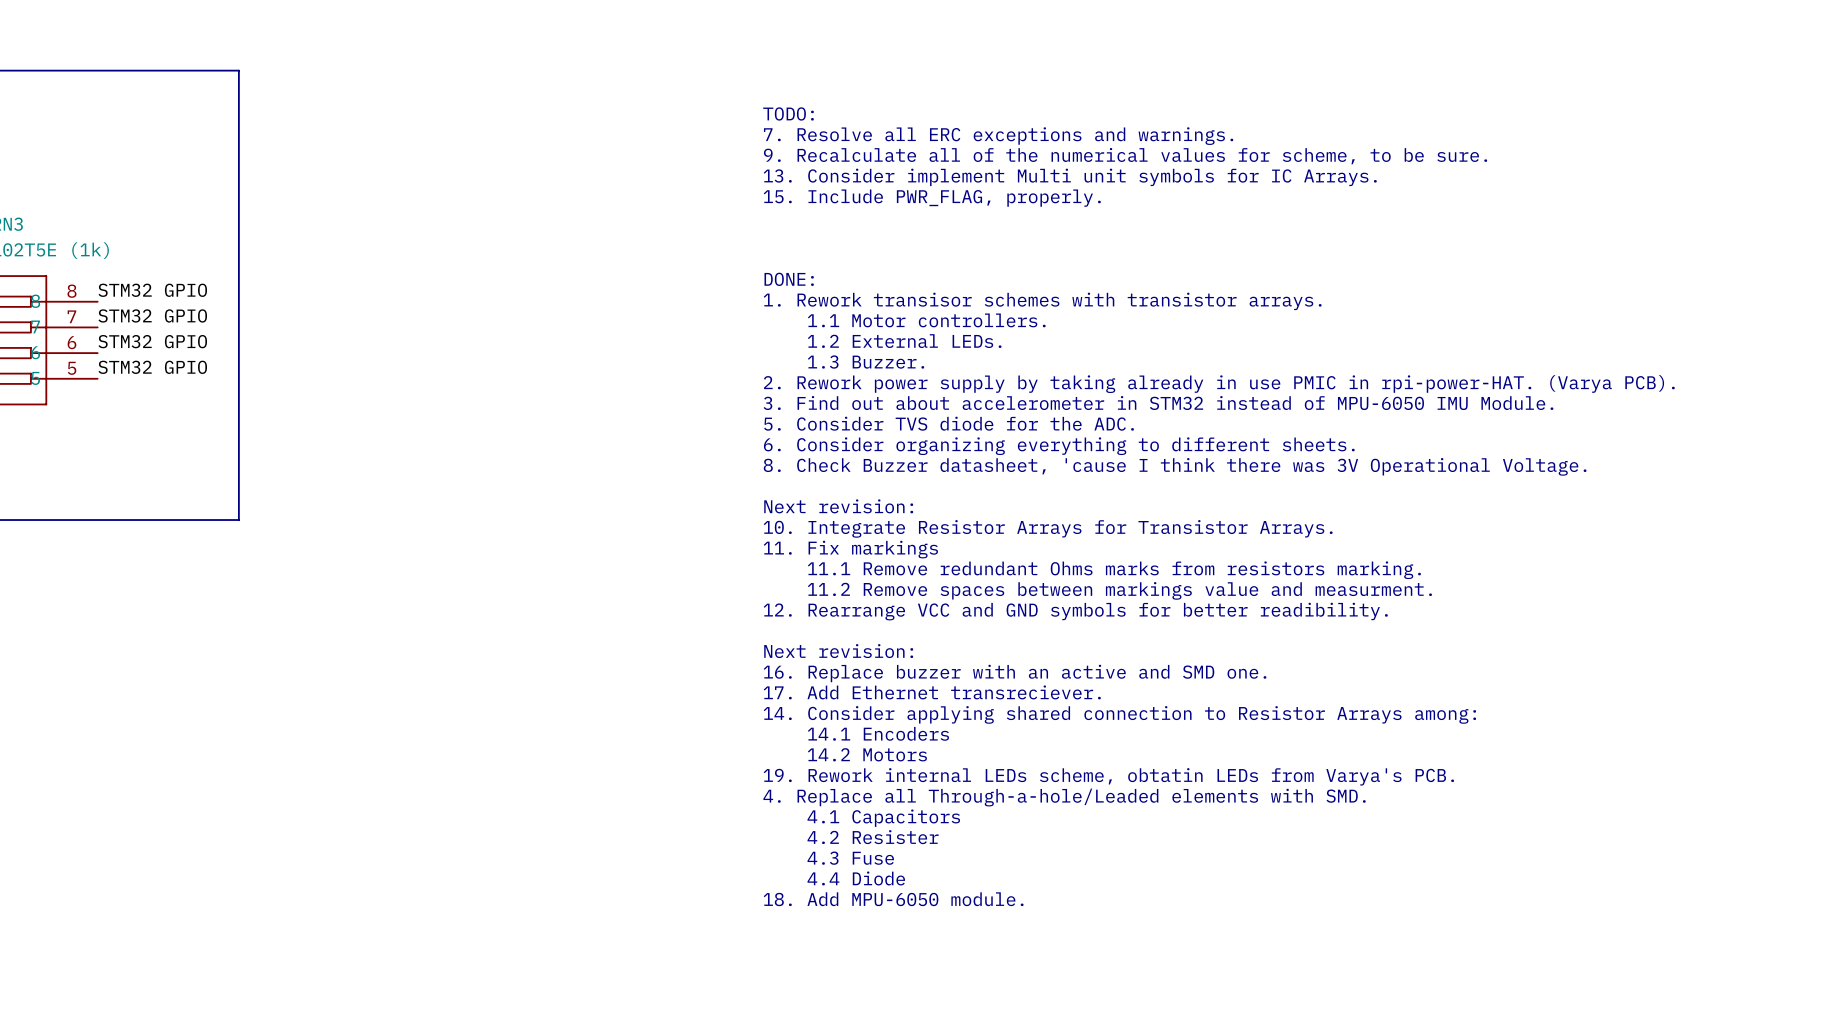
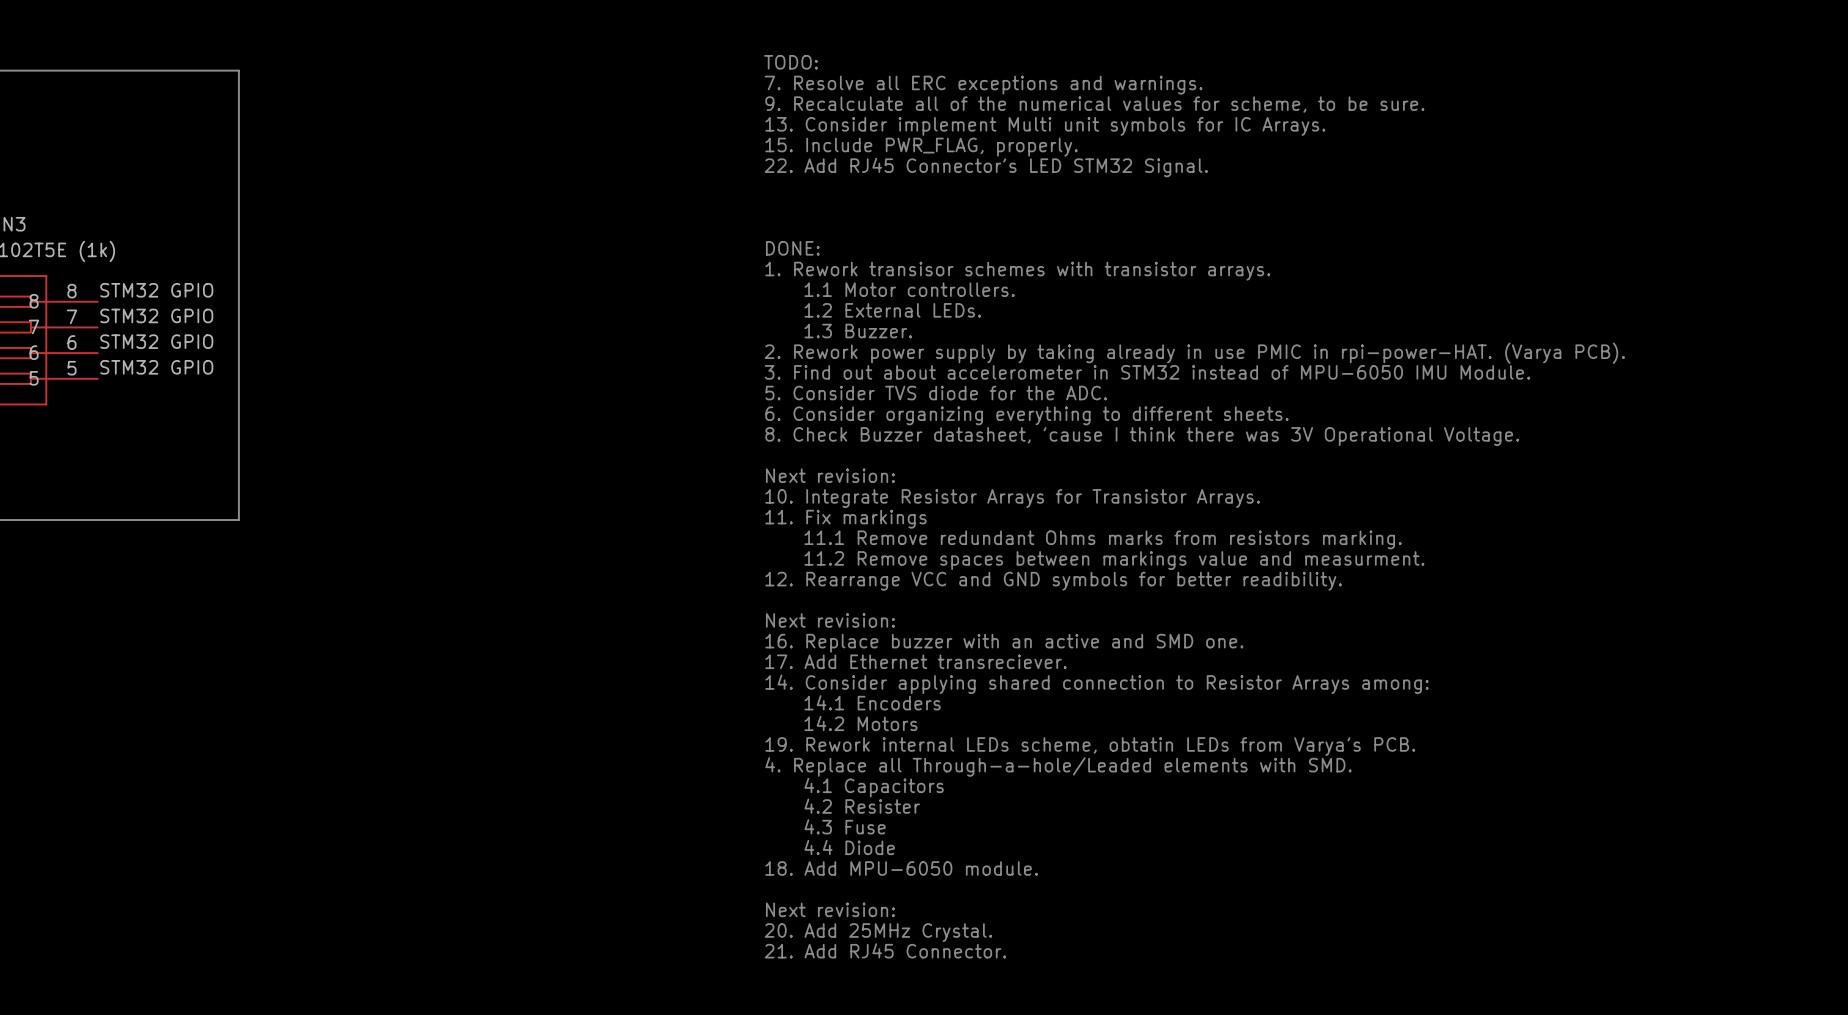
text position: TODO: (788, 113) -> TODO: (790, 62)
text position: 7. Resolve all ERC exceptions and warnings. (998, 136) -> 7. Resolve all ERC exceptions and warnings. (983, 85)
text position: 9. Recalculate all of the numerical values for scheme, to be sure. (1125, 156) -> 9. Recalculate all of the numerical values for scheme, to be sure. (1094, 104)
text: none -> 22. Add RJ45 Connector's LED STM32 Signal. (986, 167)
text position: 13. Consider implement Multi unit symbols for IC Arrays. (1070, 177) -> 13. Consider implement Multi unit symbols for IC Arrays. (1045, 126)
text position: 15. Include PWR_FLAG, properly. (932, 198) -> 15. Include PWR_FLAG, properly. (921, 147)
text position: DONE: (789, 279) -> DONE: (792, 248)
text position: 1. Rework transisor schemes with transistor arrays. (1042, 301) -> 1. Rework transisor schemes with transistor arrays. (1017, 271)
text position: 1.1 Motor controllers. (926, 320) -> 1.1 Motor controllers. (909, 289)
text position: 1.2 External LEDs. (904, 341) -> 1.2 External LEDs. (892, 310)
text position: 1.3 Buzzer. (866, 362) -> 1.3 Buzzer. (858, 331)
text position: 2. Rework power supply by taking already in use PMIC in rpi-power-HAT. (Varya PCB). (1219, 384) -> 2. Rework power supply by taking already in use PMIC in rpi-power-HAT. (Varya PCB). (1194, 353)
text position: 3. Find out about accelerometer in STM32 instead of MPU-6050 IMU Module. (1158, 403) -> 3. Find out about accelerometer in STM32 instead of MPU-6050 IMU Module. (1147, 372)
text position: 5. Consider TVS diode for the ADC. (948, 423) -> 5. Consider TVS diode for the ADC. (936, 393)
text position: 6. Consider organizing everything to different sheets. (1059, 446) -> 6. Consider organizing everything to different sheets. (1026, 415)
text position: 8. Check Buzzer datasheet, 'cause I think there was 3V Operational Voltage. (1175, 466) -> 8. Check Buzzer datasheet, 'cause I think there was 3V Operational Voltage. (1142, 436)
text position: Next revision: (838, 506) -> Next revision: (830, 475)
text position: 10. Integrate Resistor Arrays for Transistor Arrays. (1048, 528) -> 10. Integrate Resistor Arrays for Transistor Arrays. (1012, 498)
text position: 11. Fix markings (850, 549) -> 11. Fix markings (846, 519)
text position: 11.1 Remove redundant Ohms marks from resistors marking. (1114, 570) -> 11.1 Remove redundant Ohms marks from resistors marking. (1103, 539)
text position: 11.2 Remove spaces between markings value and measurment. (1119, 590) -> 11.2 Remove spaces between markings value and measurment. (1114, 560)
text position: 12. Rearrange VCC and GND symbols for better readibility. (1075, 611) -> 12. Rearrange VCC and GND symbols for better readibility. (1053, 581)
text position: Next revision: (838, 651) -> Next revision: (830, 620)
text position: 16. Replace buzzer with an active and SMD one. (1015, 673) -> 16. Replace buzzer with an active and SMD one. (1004, 643)
text position: 17. Add Ethernet transreciever. (932, 692) -> 17. Add Ethernet transreciever. (916, 661)
text position: 14. Consider applying shared connection to Resistor Arrays among: (1119, 714) -> 14. Consider applying shared connection to Resistor Arrays among: (1097, 684)
text position: 14.1 Encoders (878, 733) -> 14.1 Encoders (872, 702)
text position: 14.2 Motors (867, 754) -> 14.2 Motors (860, 723)
text position: 19. Rework internal LEDs scheme, obtatin LEDs from Varya's PCB. (1108, 776) -> 19. Rework internal LEDs scheme, obtatin LEDs from Varya's PCB. (1090, 746)
text position: 4. Replace all Through-a-hole/Leaded elements with SMD. (1064, 797) -> 4. Replace all Through-a-hole/Leaded elements with SMD. (1058, 766)
text position: 4.1 Capacitors (883, 818) -> 4.1 Capacitors (874, 787)
text position: 4.2 Resister (873, 837) -> 4.2 Resister (862, 806)
text position: 4.3 Fuse (850, 858) -> 4.3 Fuse (845, 826)
text position: 4.4 Diode (856, 878) -> 4.4 Diode (849, 847)
text position: 18. Add MPU-6050 module. (893, 899) -> 18. Add MPU-6050 module. (901, 868)
text: none -> Next revision: (830, 909)
text: none -> 20. Add 25MHz Crystal. (878, 932)
text: none -> 21. Add RJ45 Connector. (885, 950)

